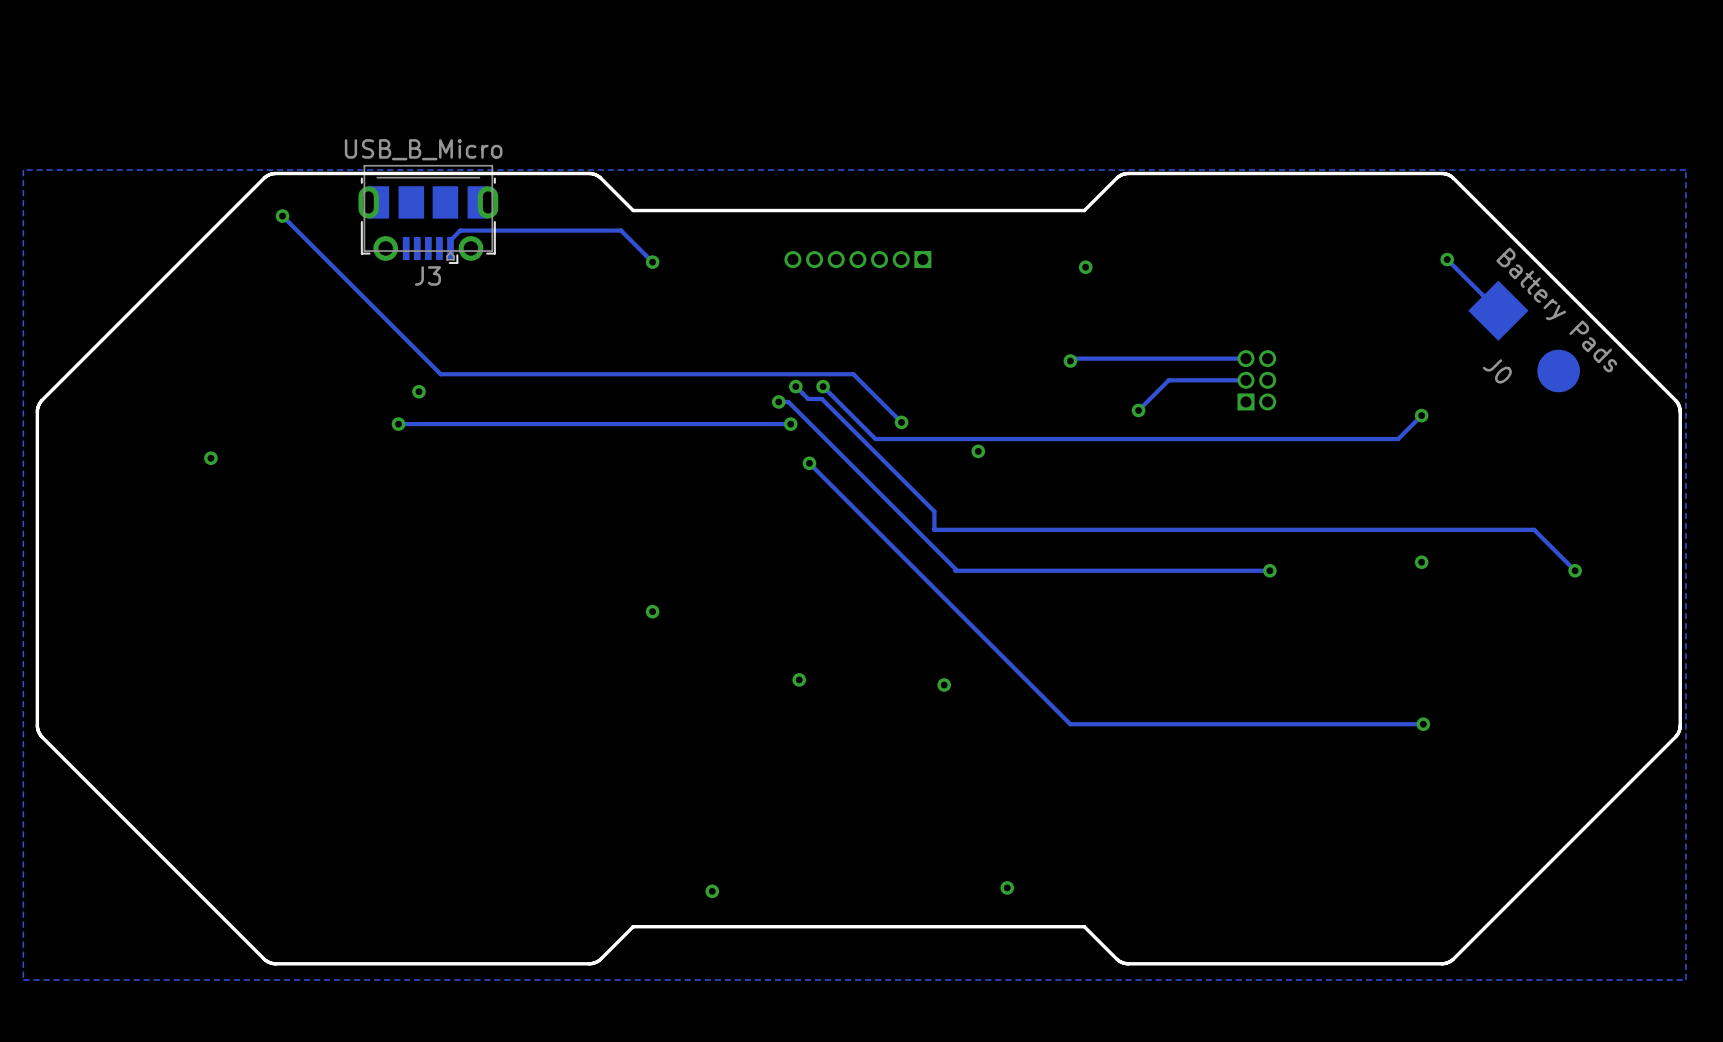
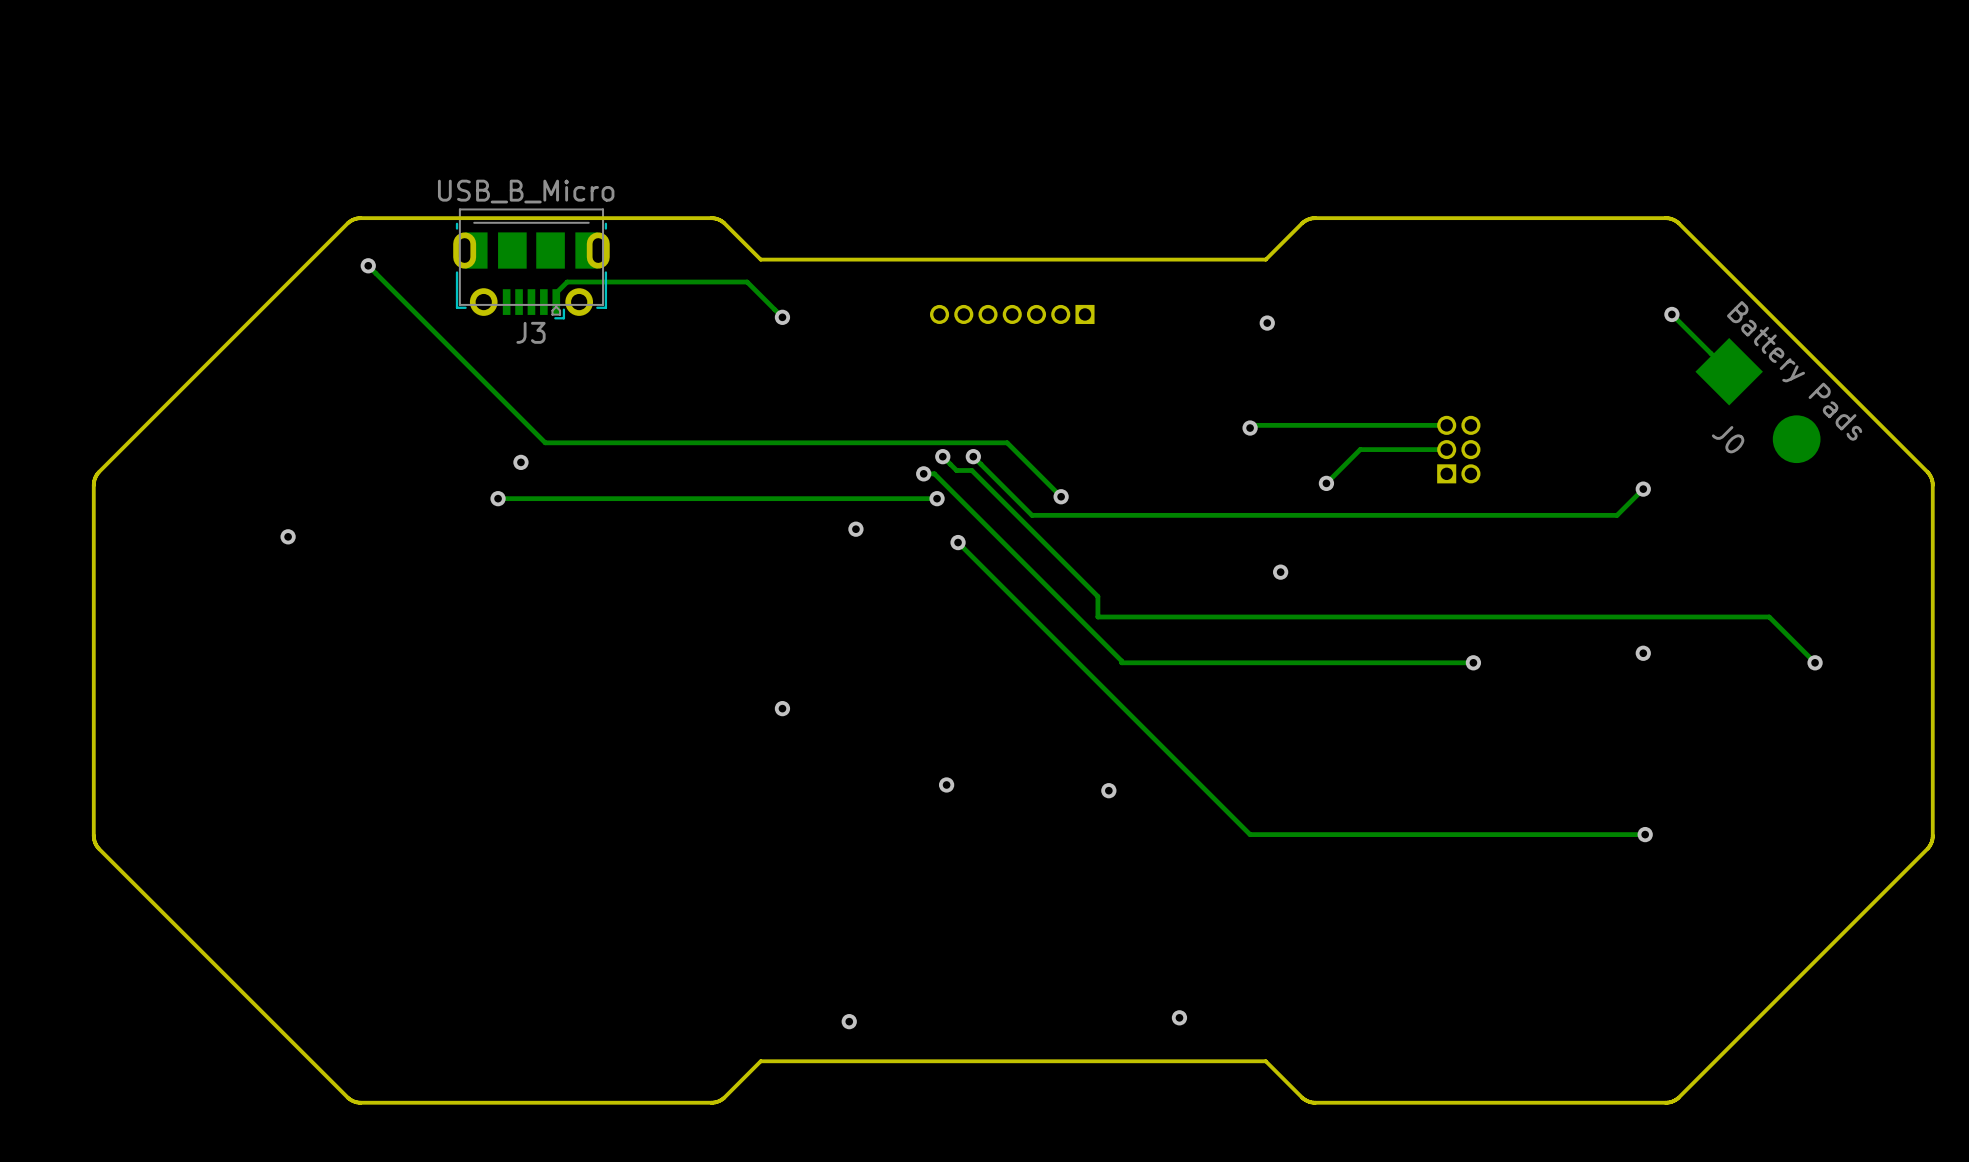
zone outline: (1685, 170) (23, 170) (23, 980) (1685, 980) (1685, 170) -> none
via: none -> (855, 529)
via: (978, 451) -> none
via: none -> (1280, 572)

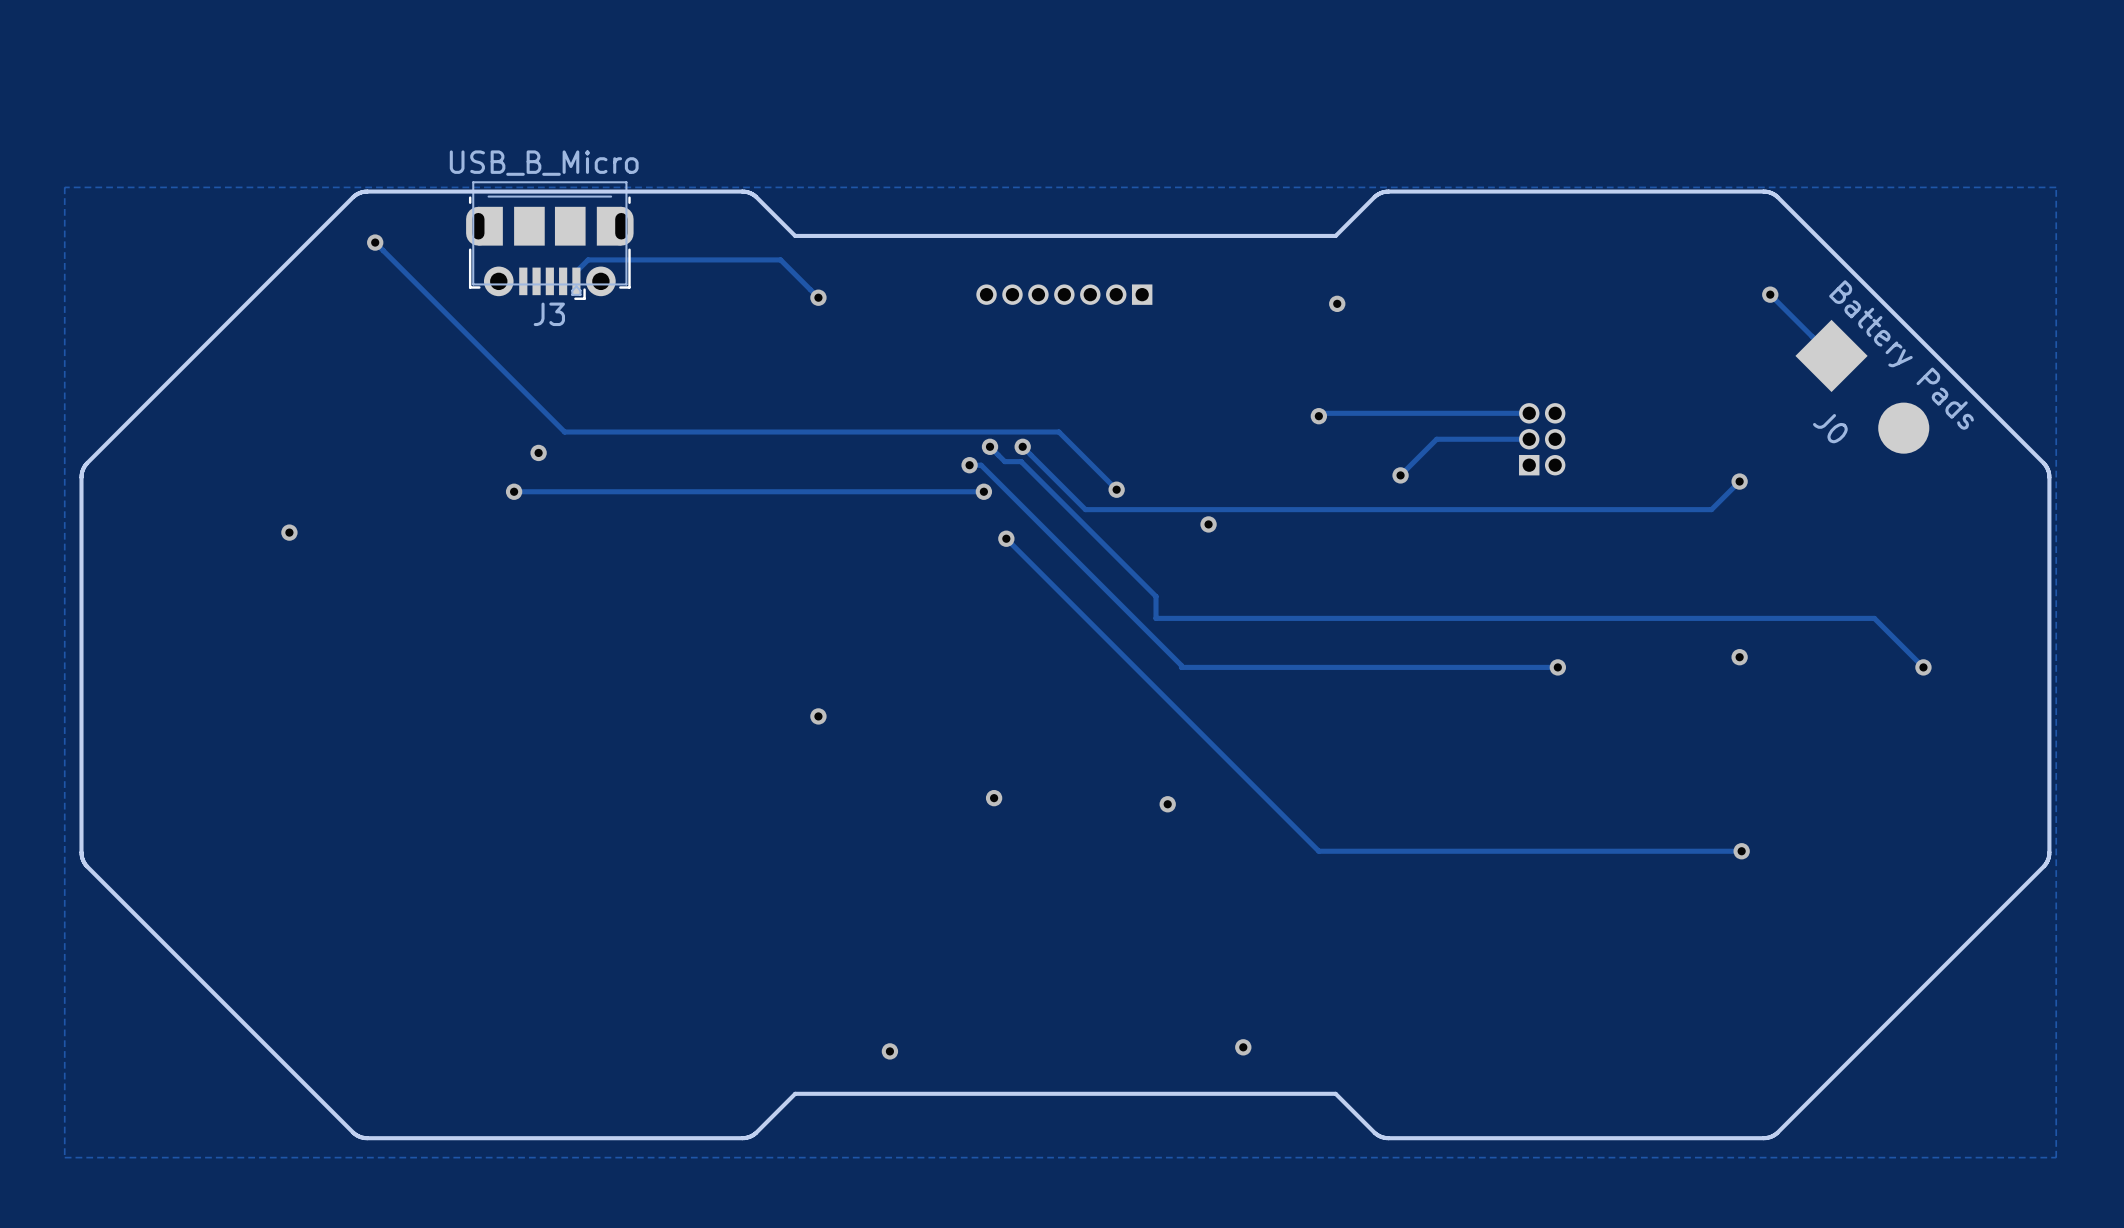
zone outline: none -> (2056, 187) (64, 187) (64, 1157) (2056, 1157) (2056, 187)
via: (855, 529) -> none
via: none -> (1208, 524)
via: (1280, 572) -> none

